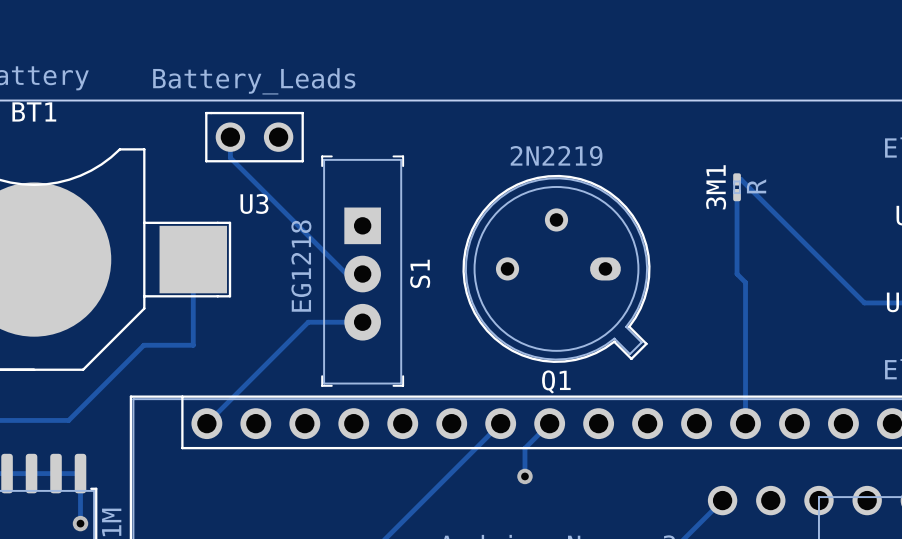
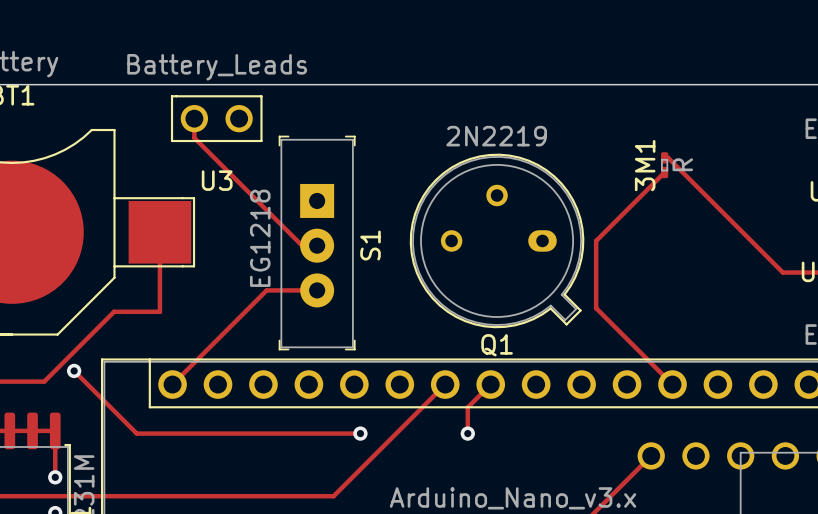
track: (737, 195) (737, 274) (745, 282) (745, 423) -> (664, 172) (596, 240) (596, 308) (672, 384)
track: none -> (74, 370) (136, 433) (360, 433)
via: none -> (74, 370)
via: none -> (360, 433)

